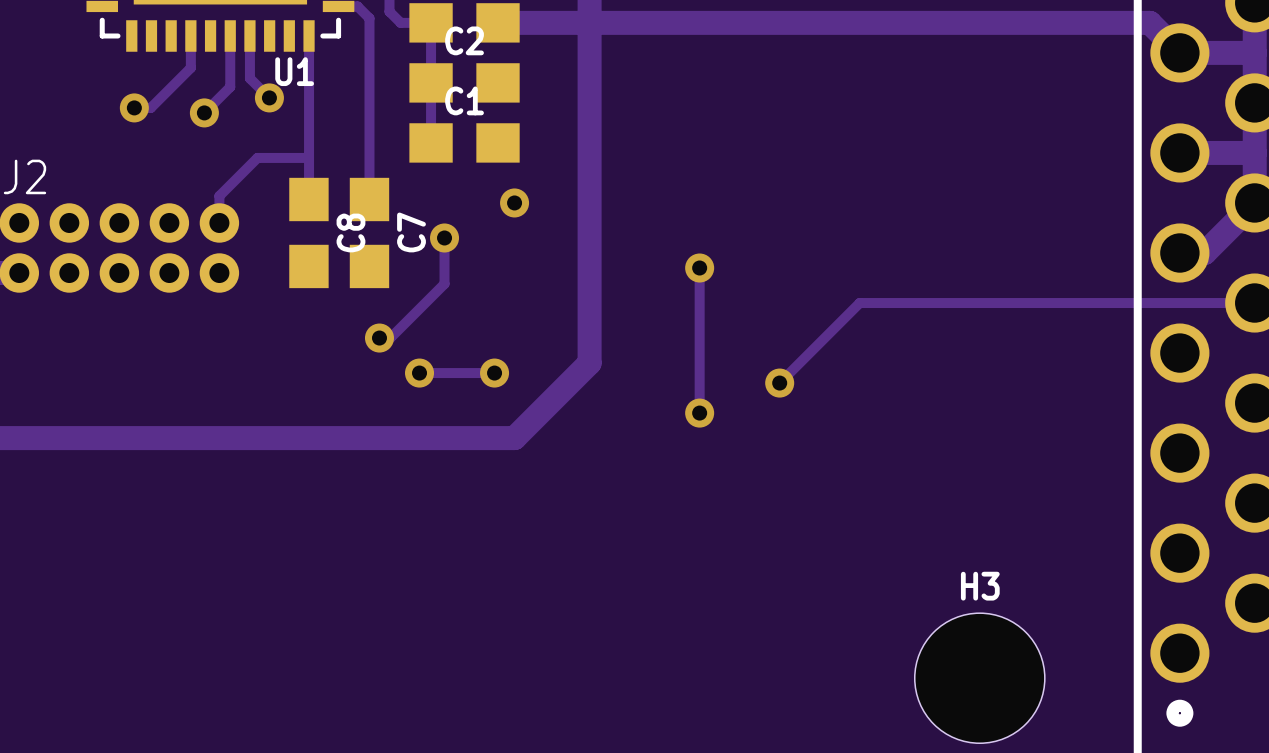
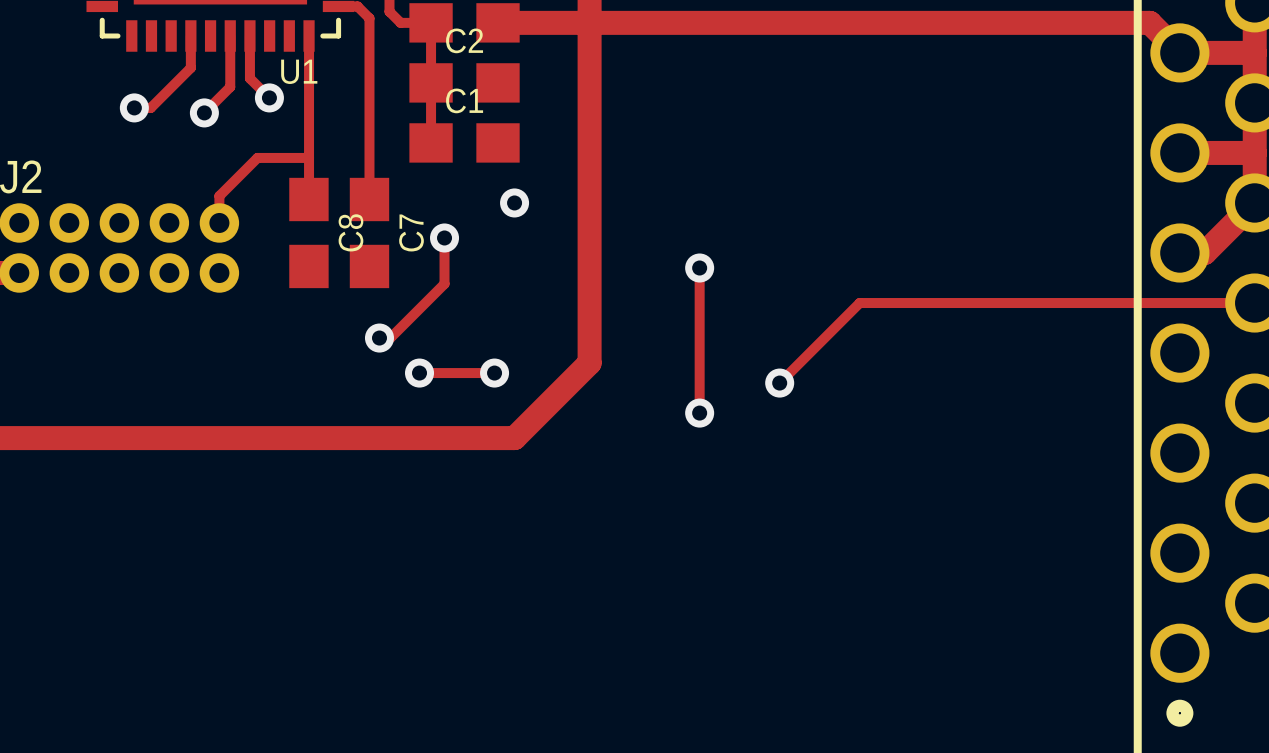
H3: (979, 678) -> none

